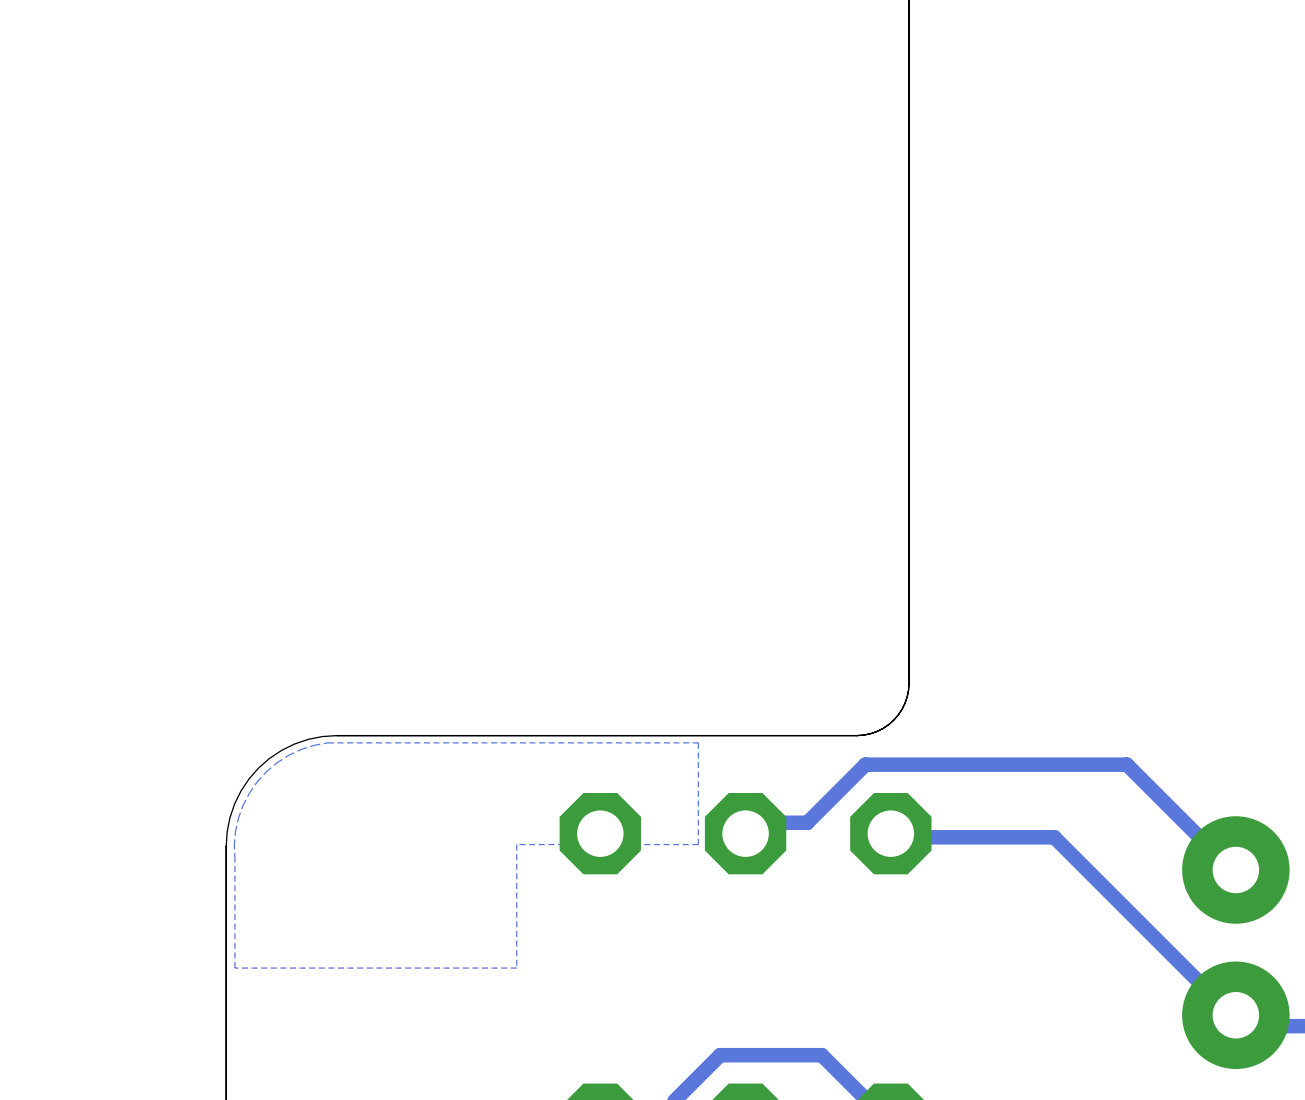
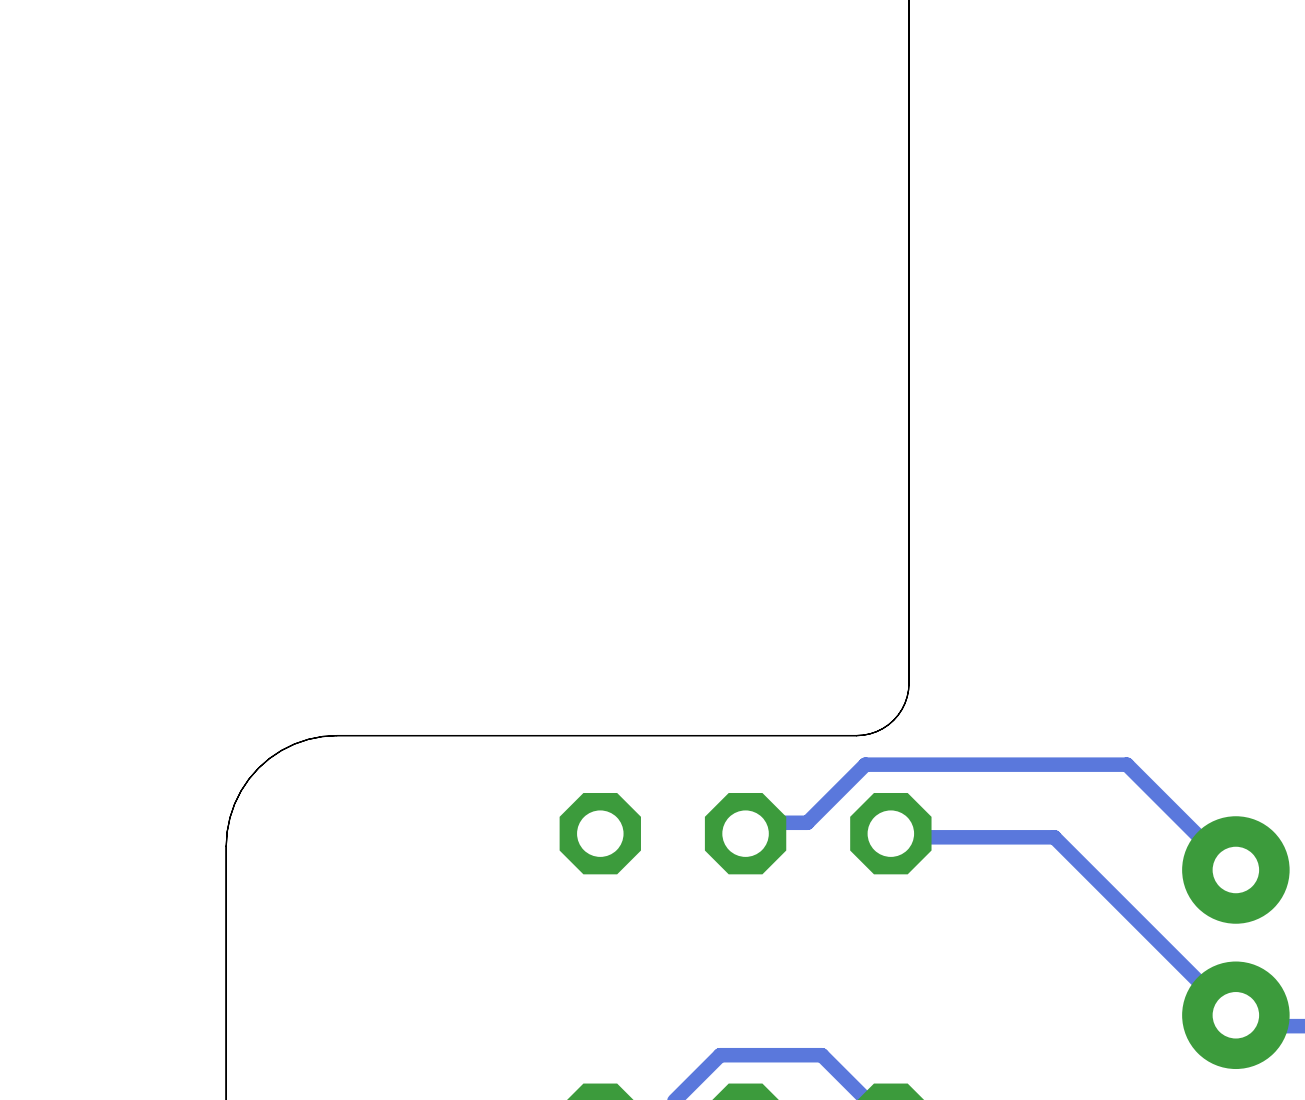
zone outline: (698, 742) (327, 742) (301, 749) (288, 755) (266, 771) (257, 781) (249, 793) (238, 818) (234, 845) (234, 968) (516, 968) (516, 844) (698, 844) (698, 742) -> none

